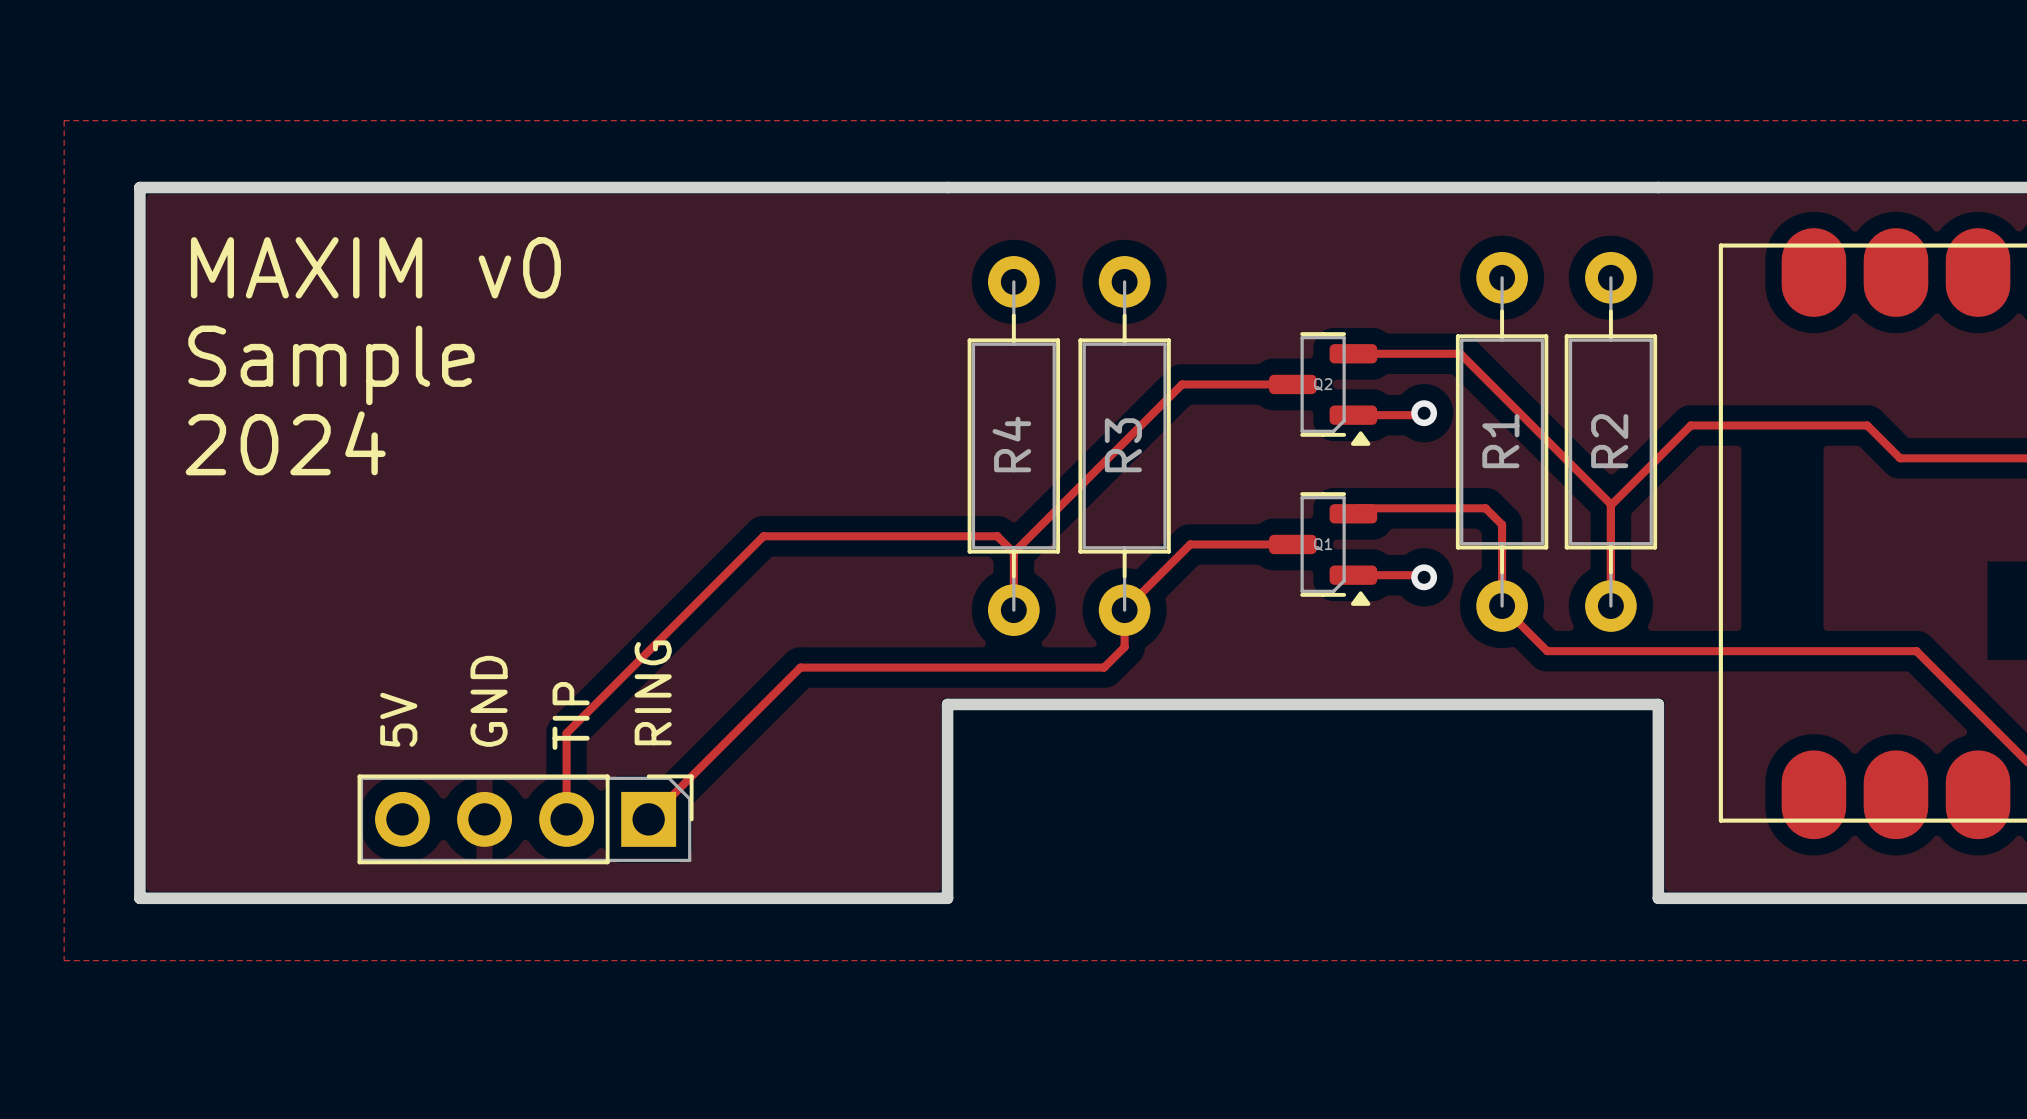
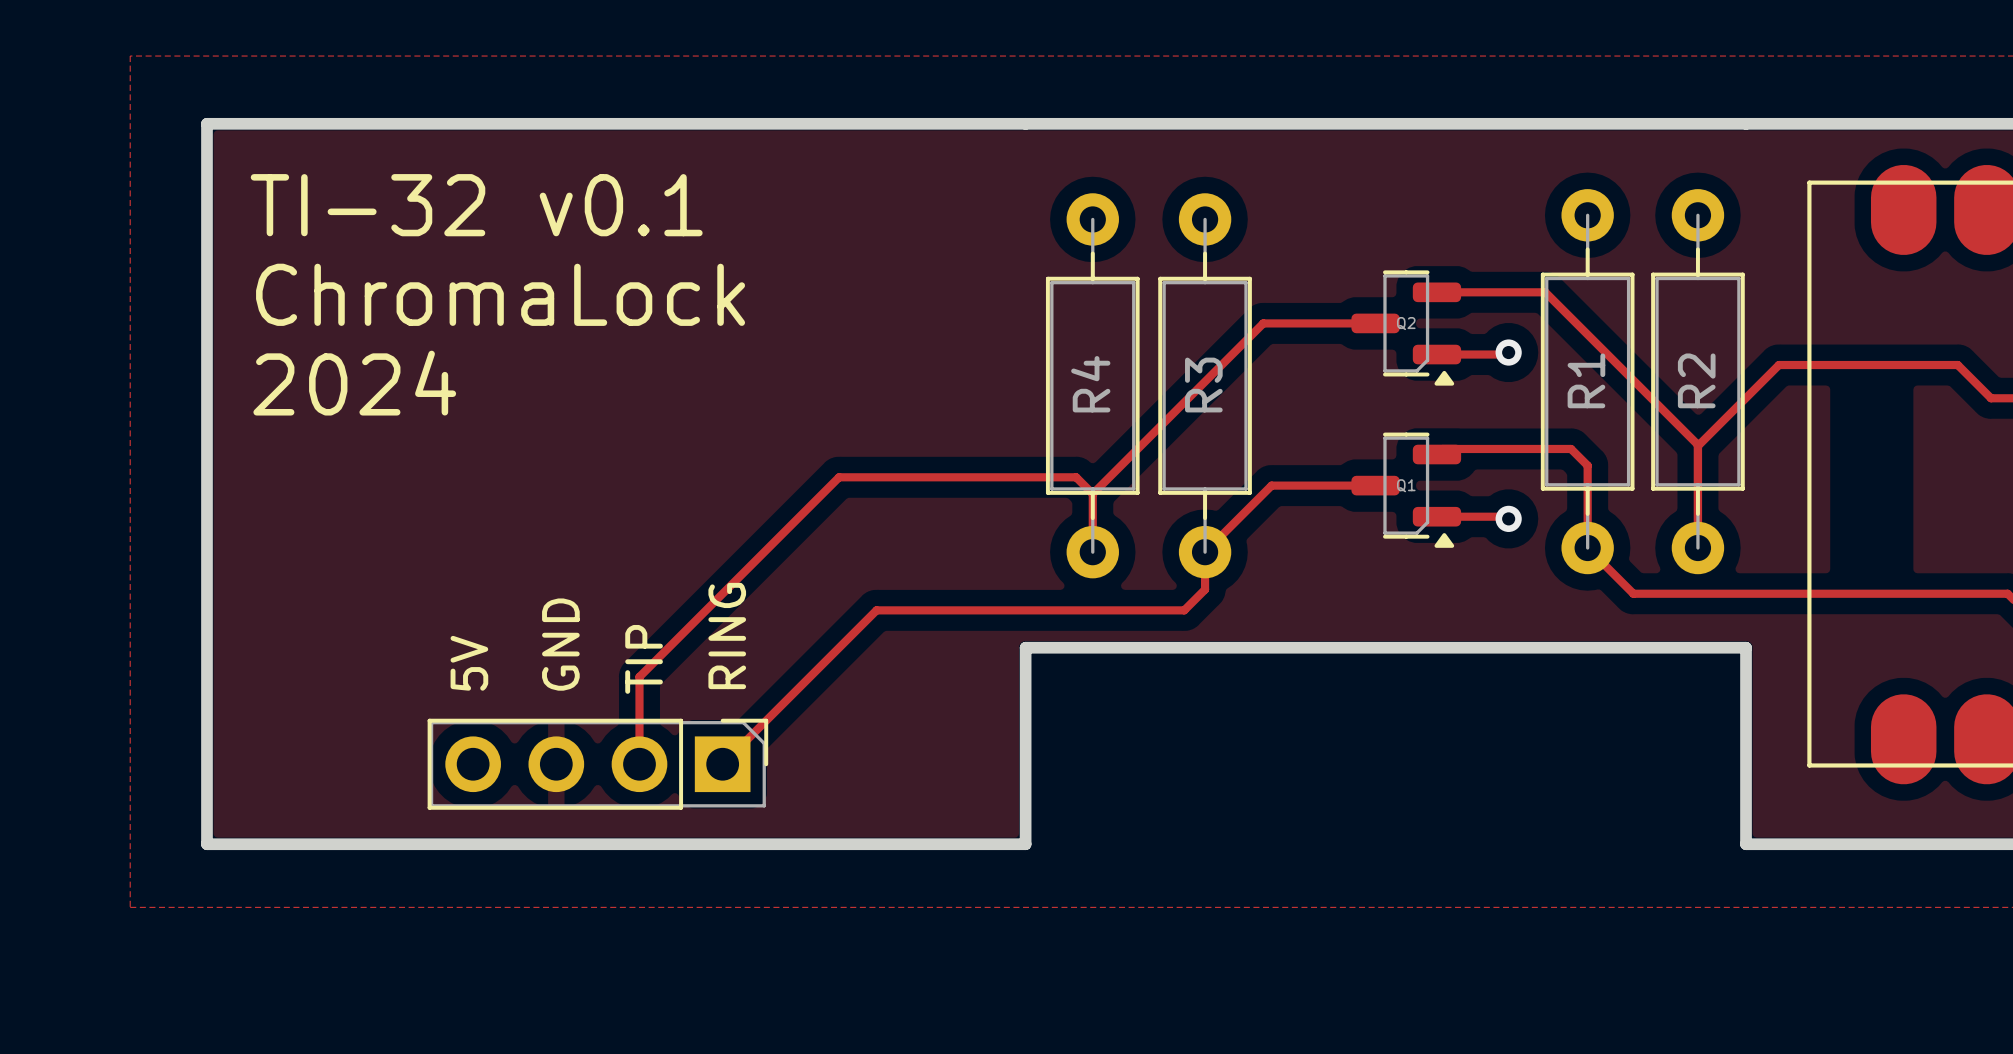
text: MAXIM v0 (375, 267) -> TI-32 v0.1 (476, 205)
text: Sample (331, 365) -> ChromaLock (500, 294)

